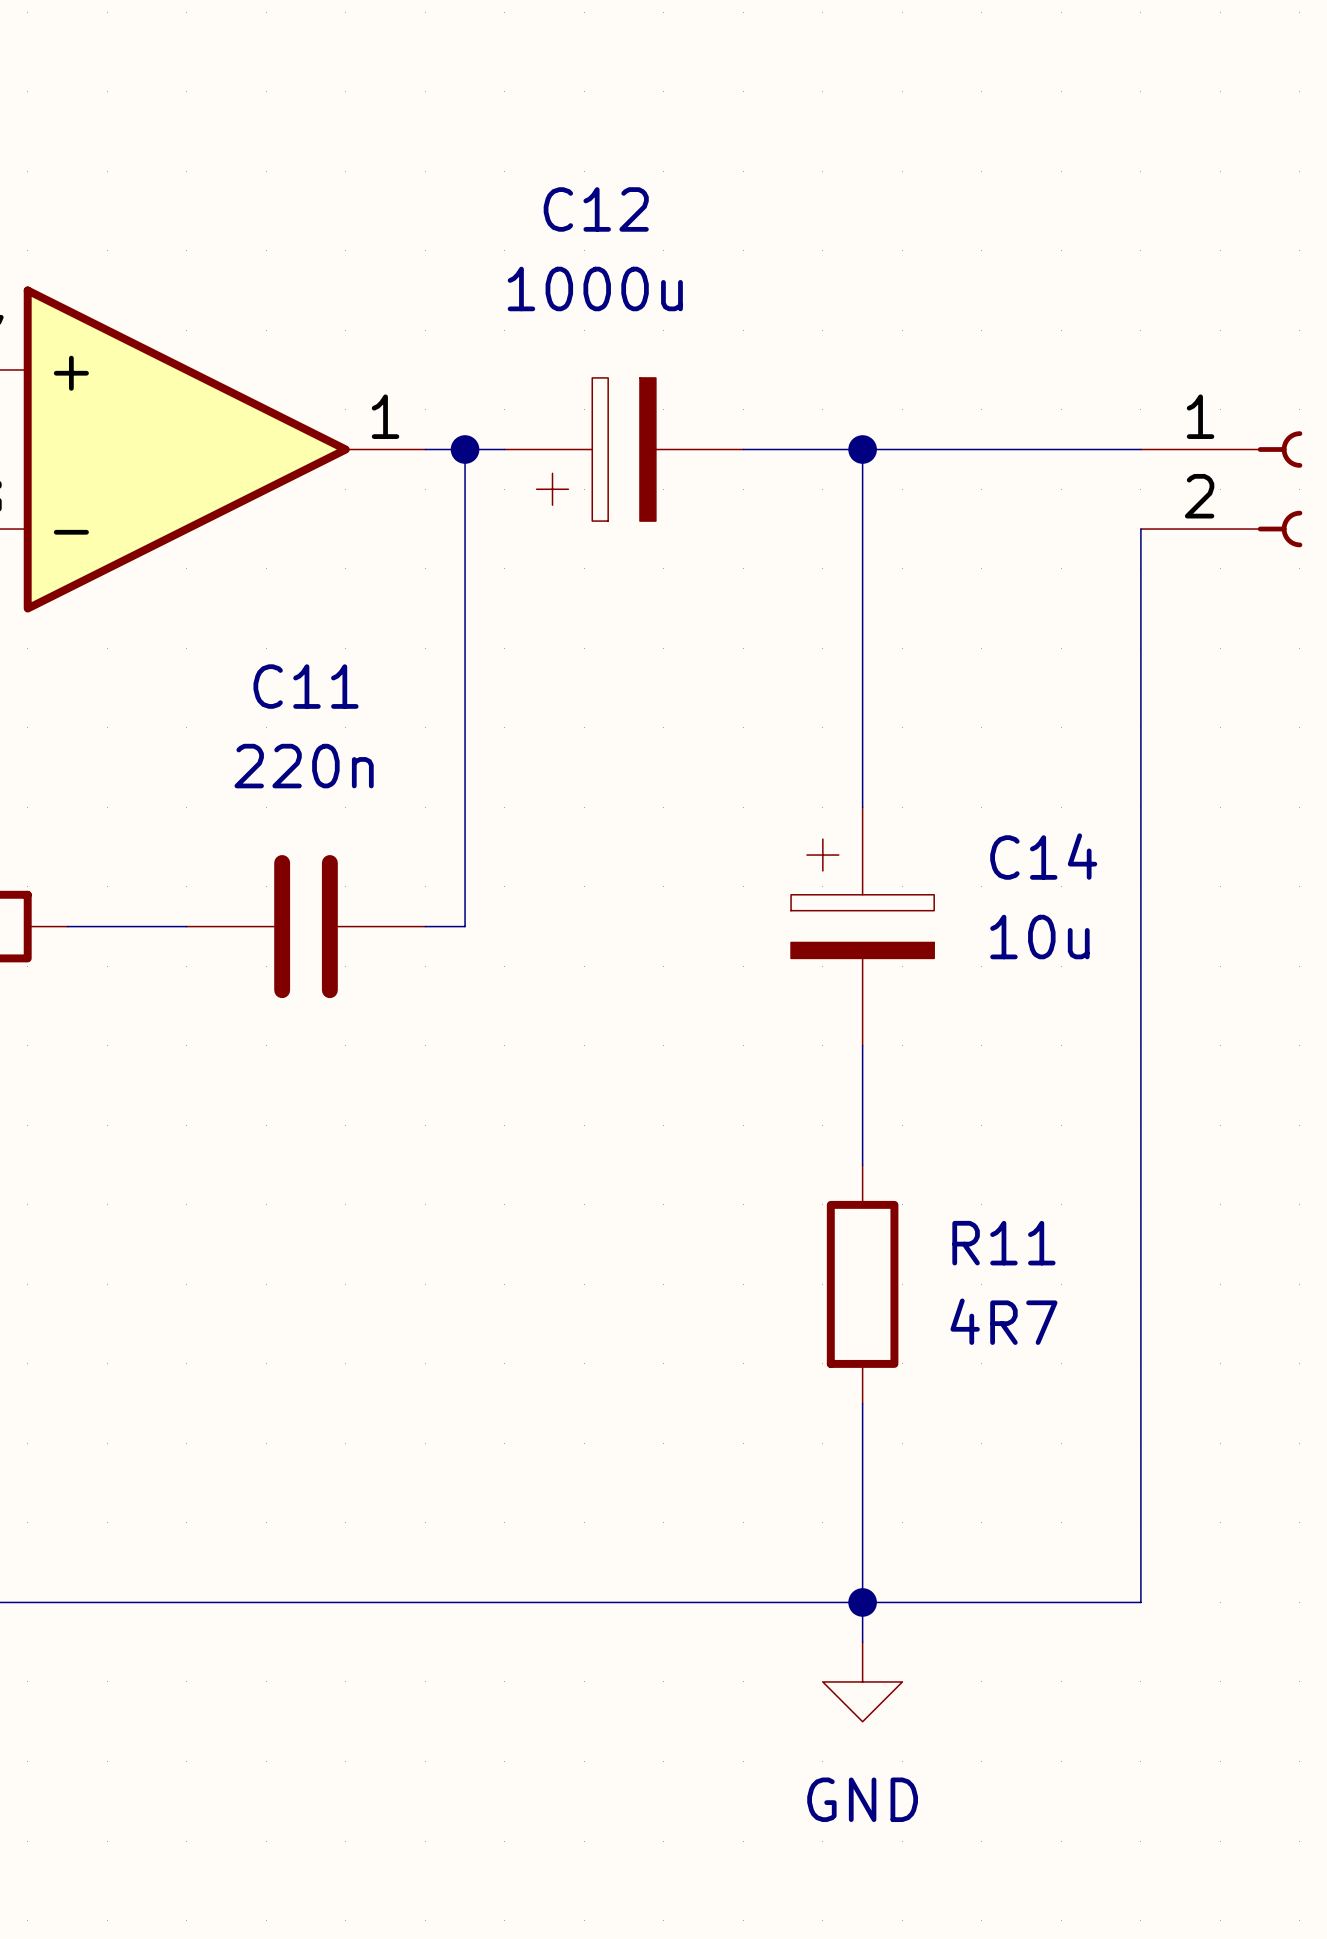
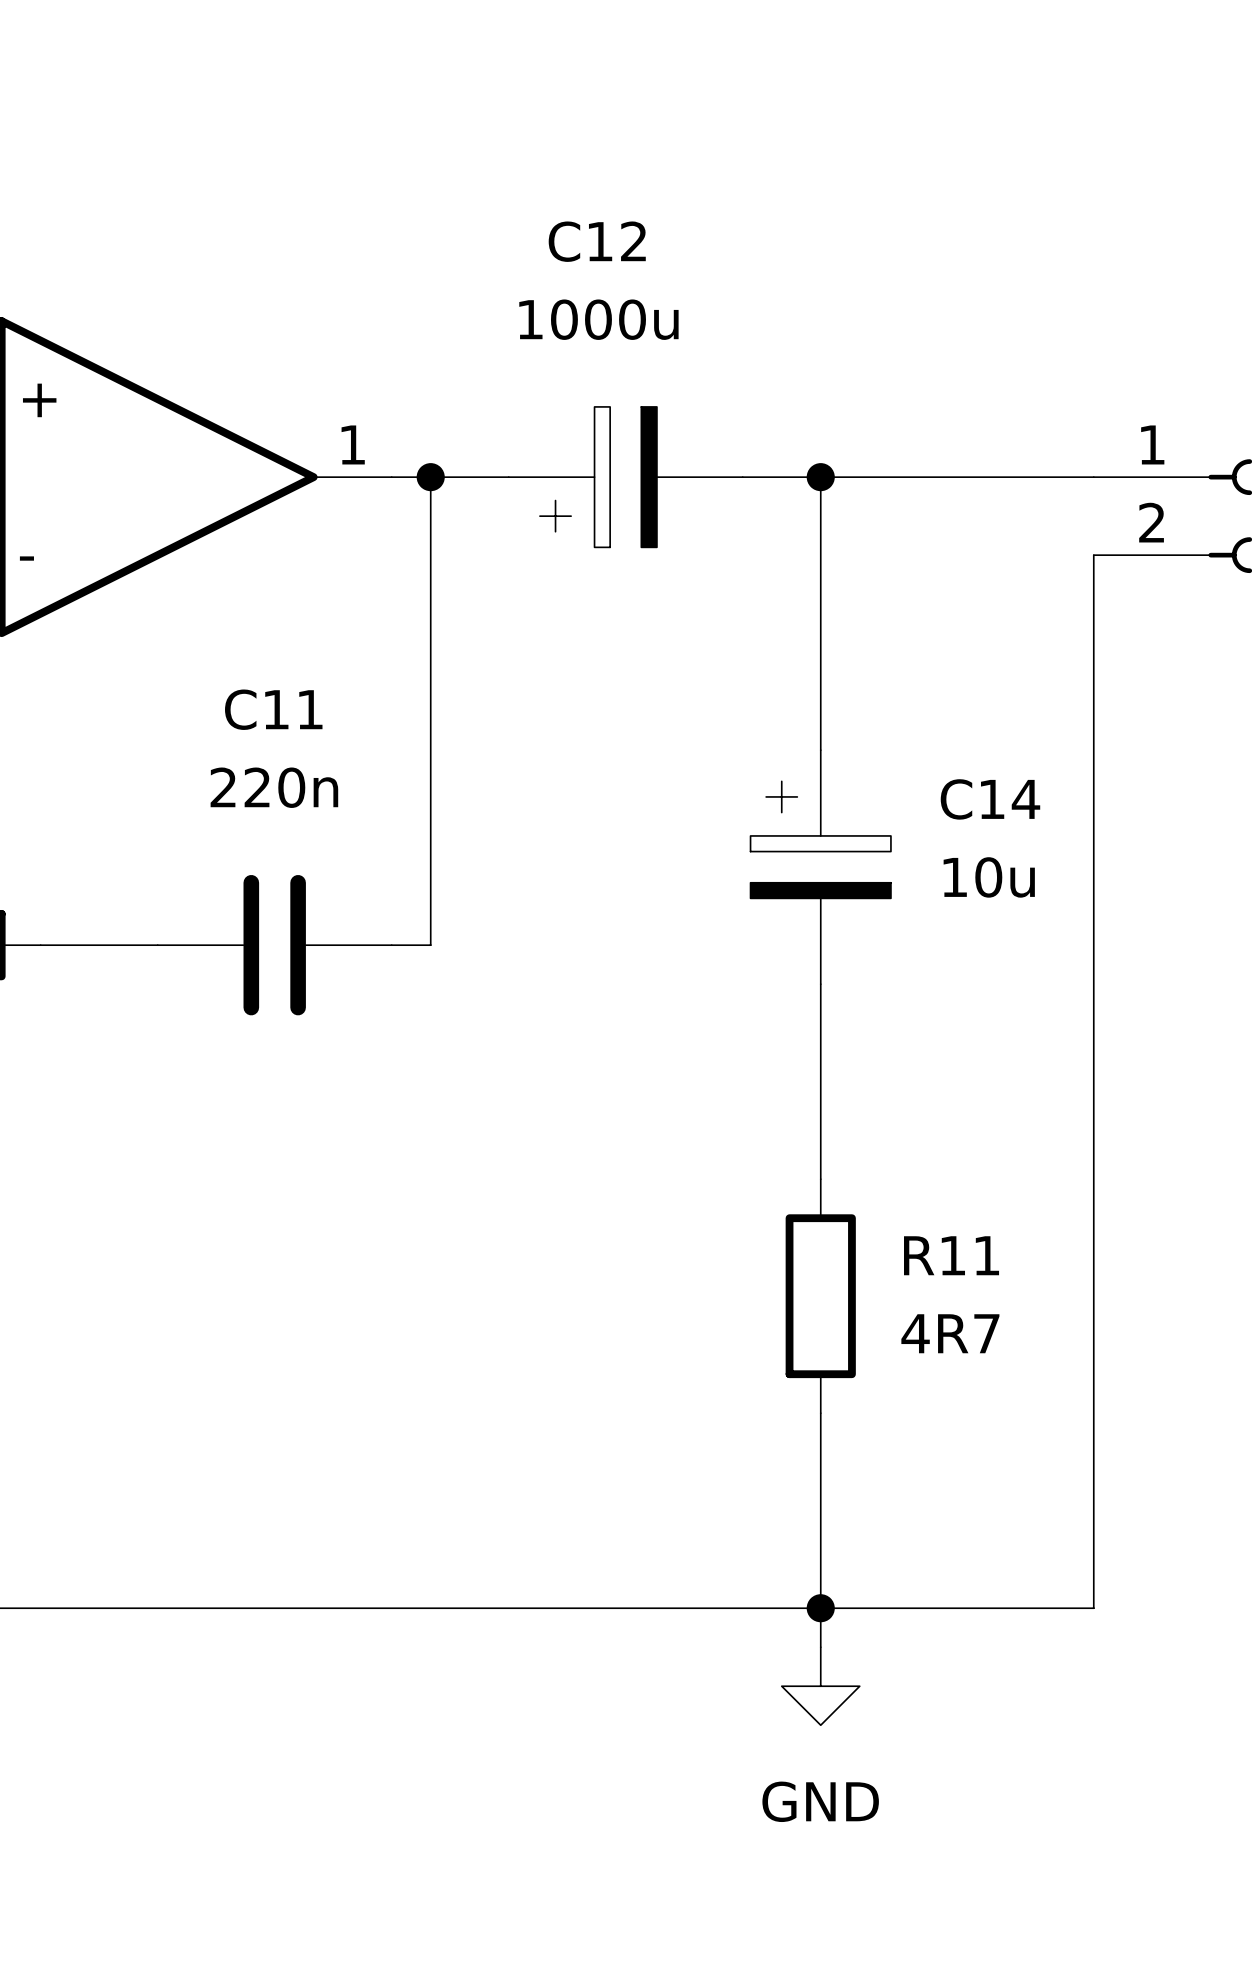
C12 position: (624, 449) -> (625, 477)
C14 position: (862, 926) -> (820, 867)

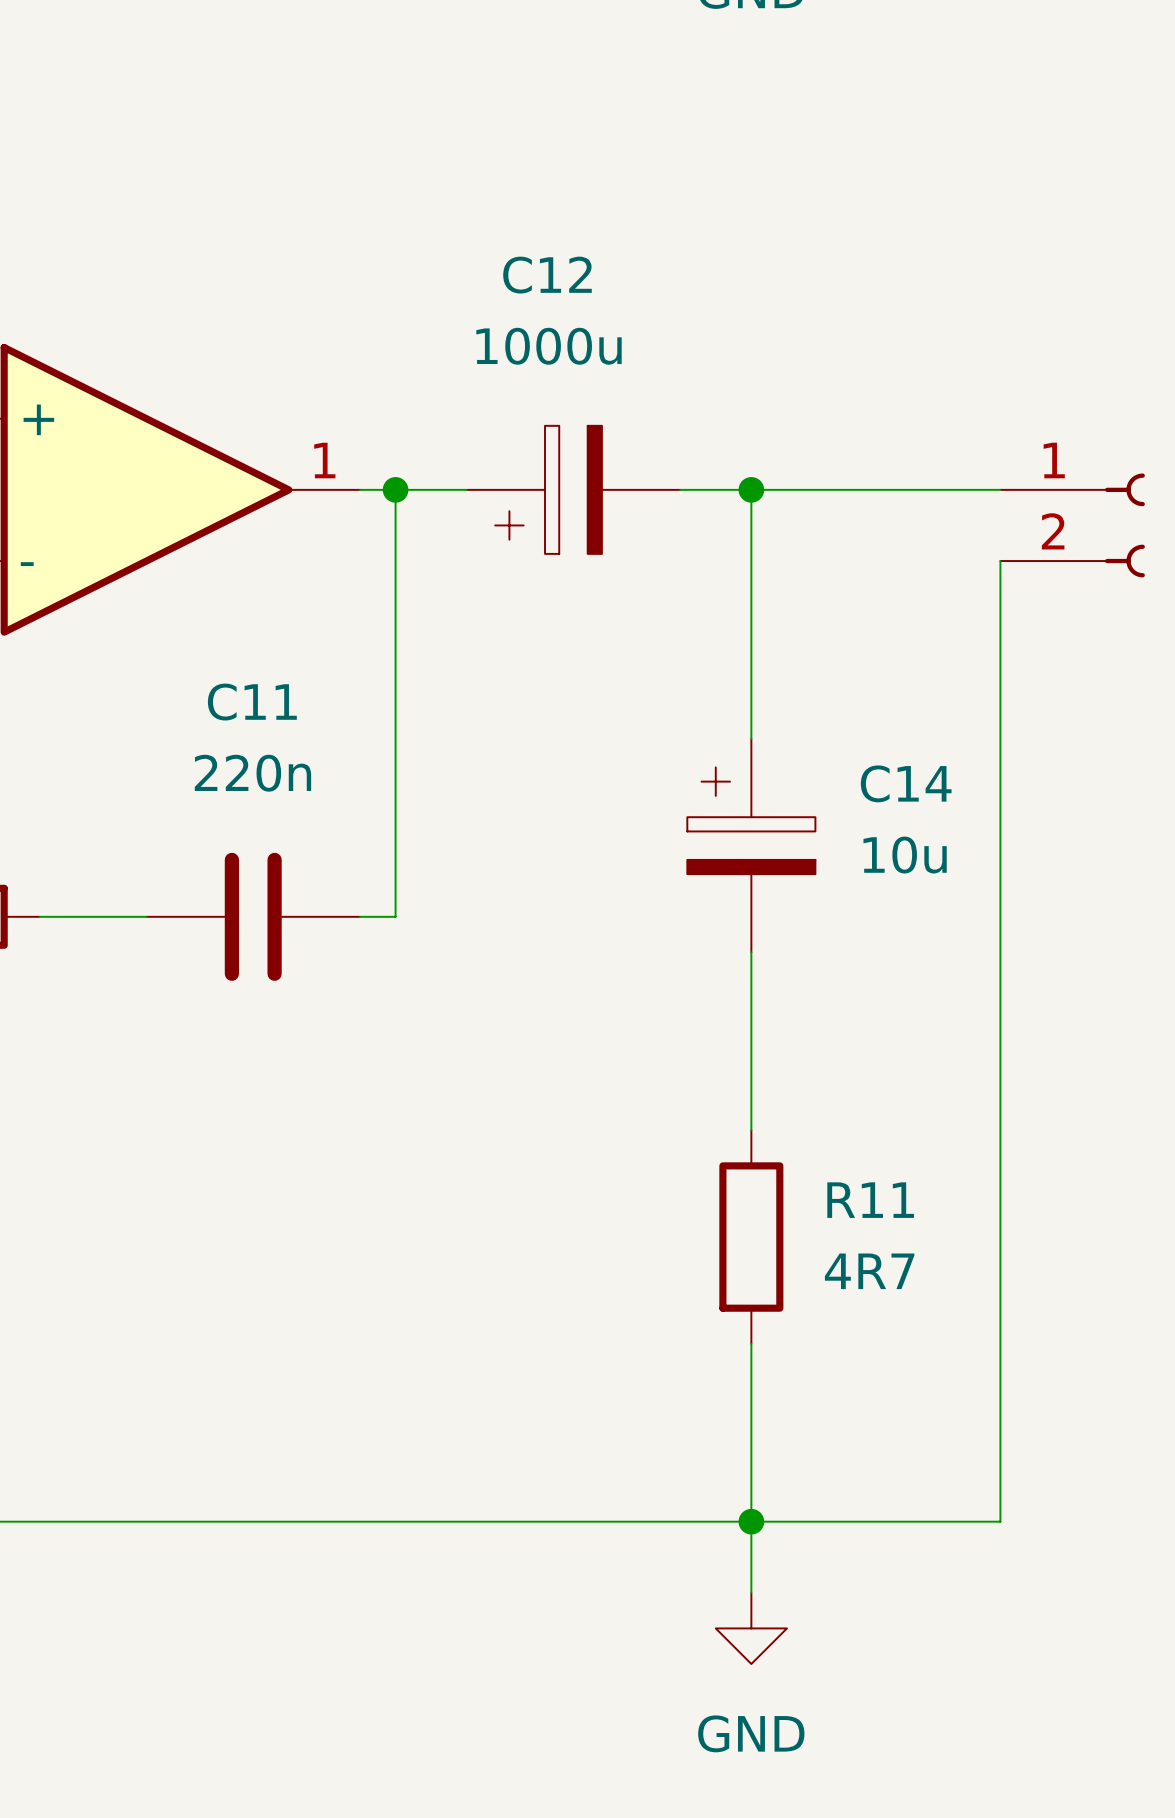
power symbol position: GND (820, 1686) -> GND (751, 1628)

